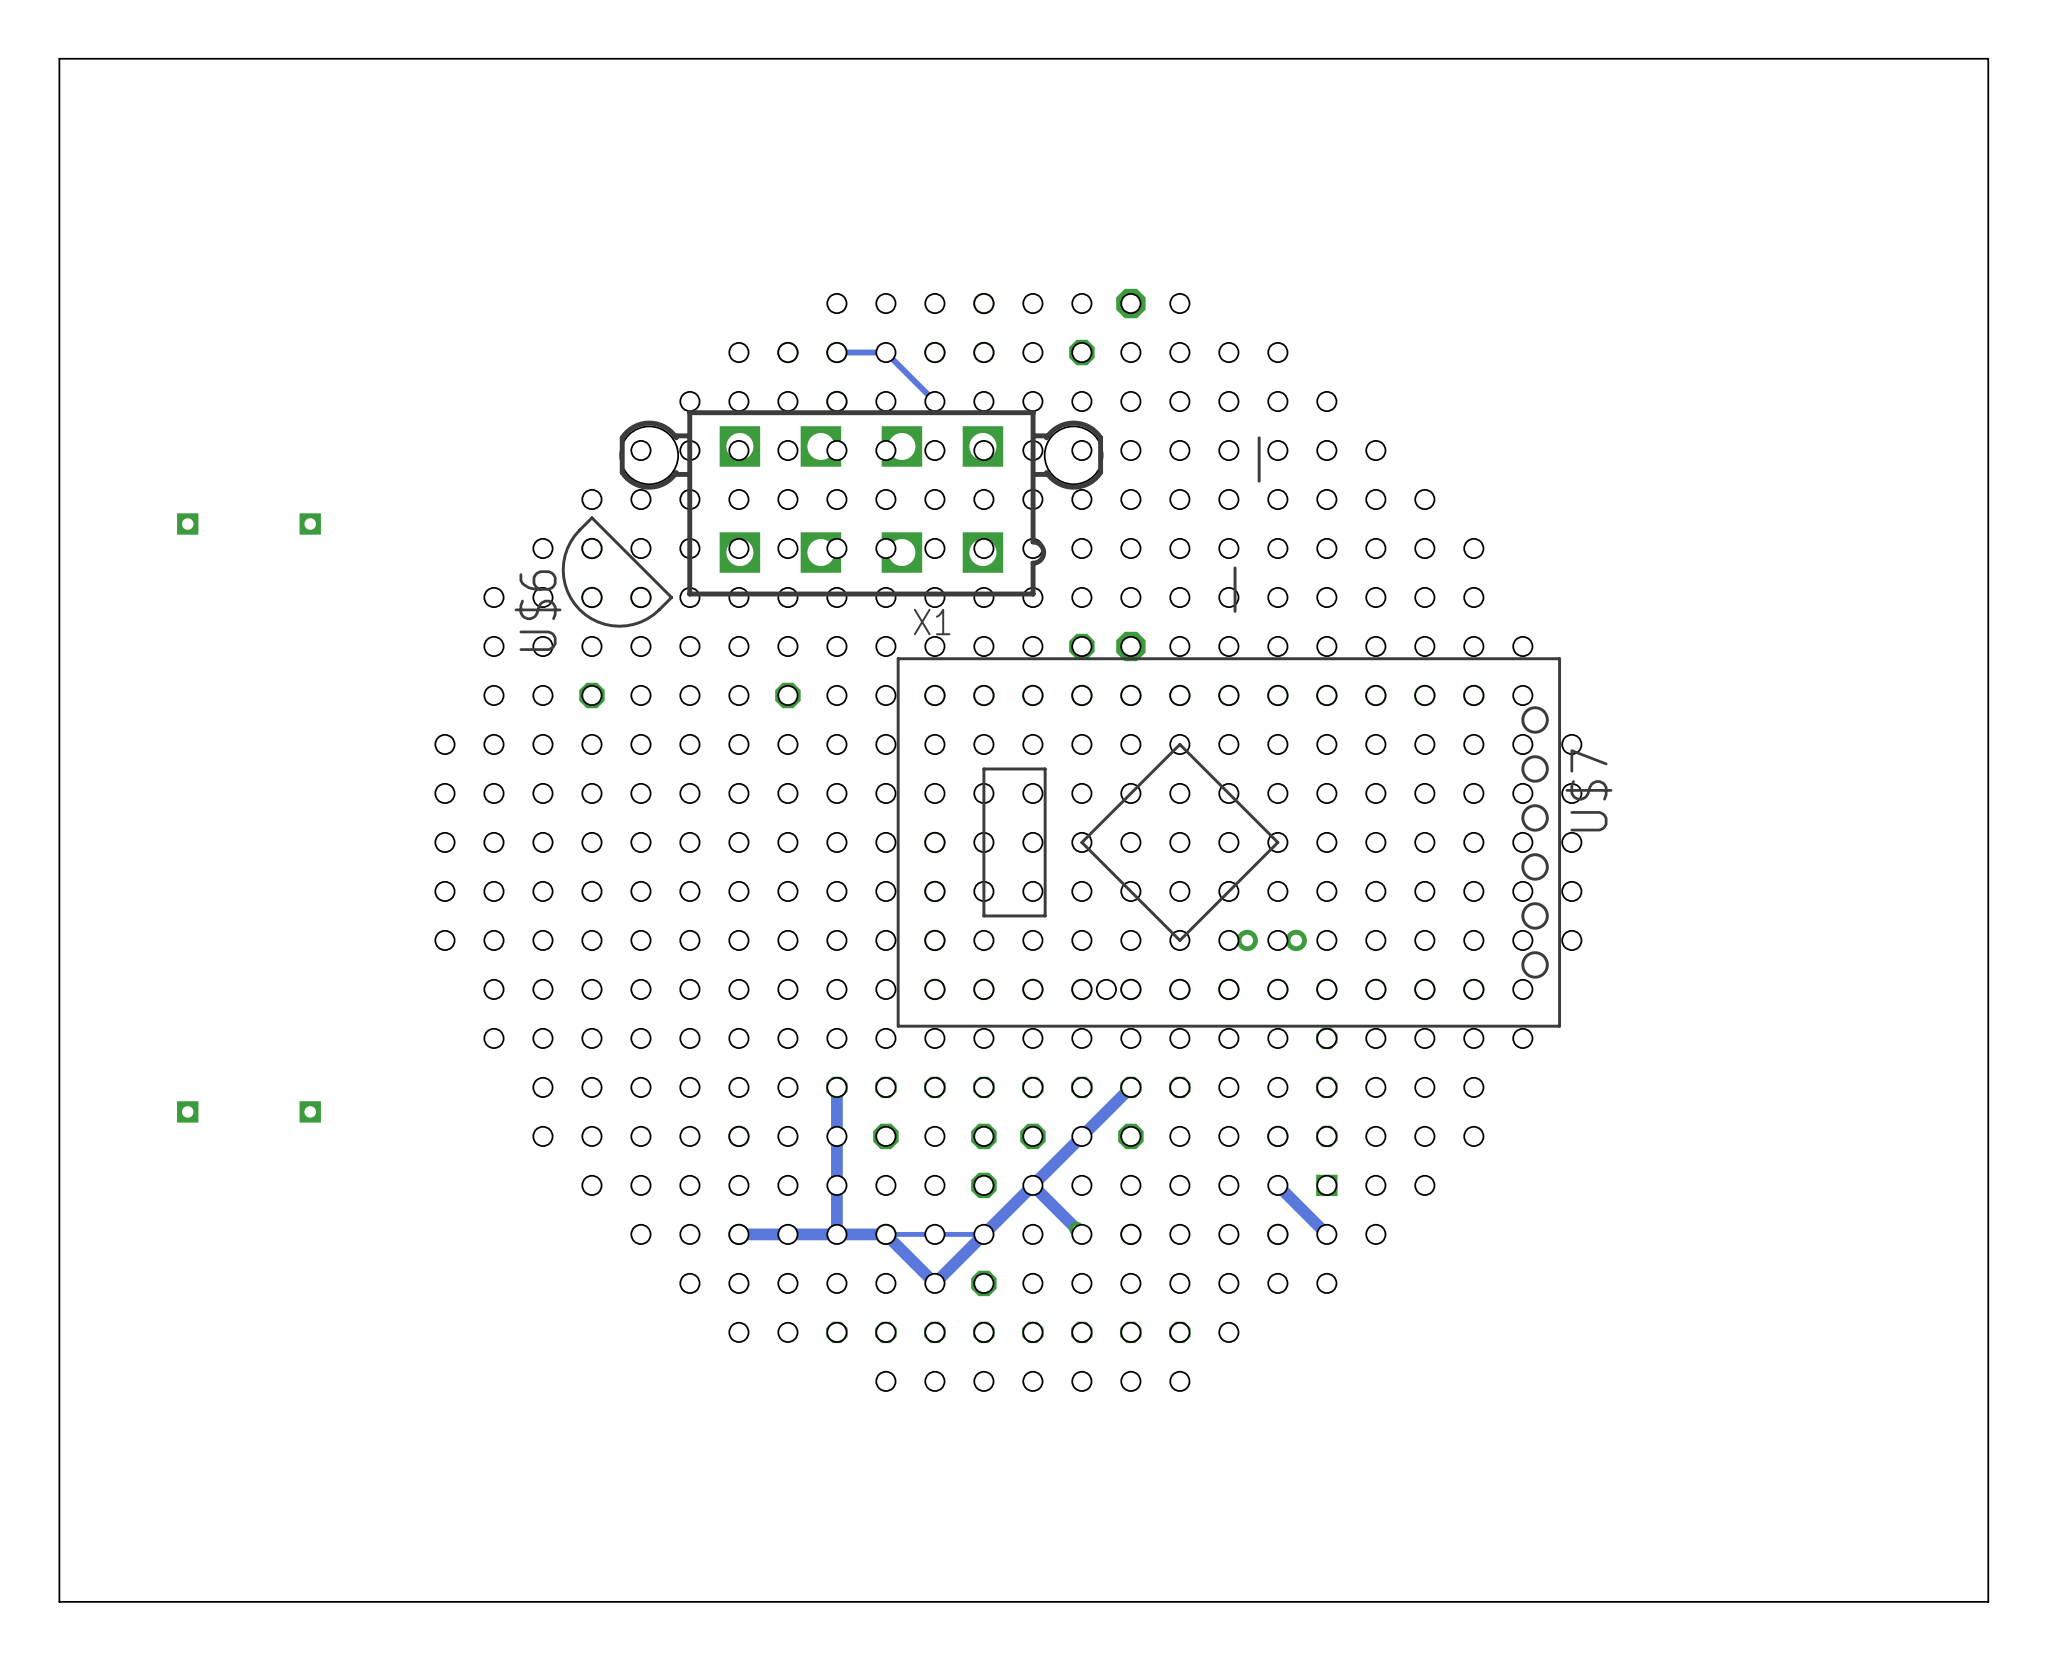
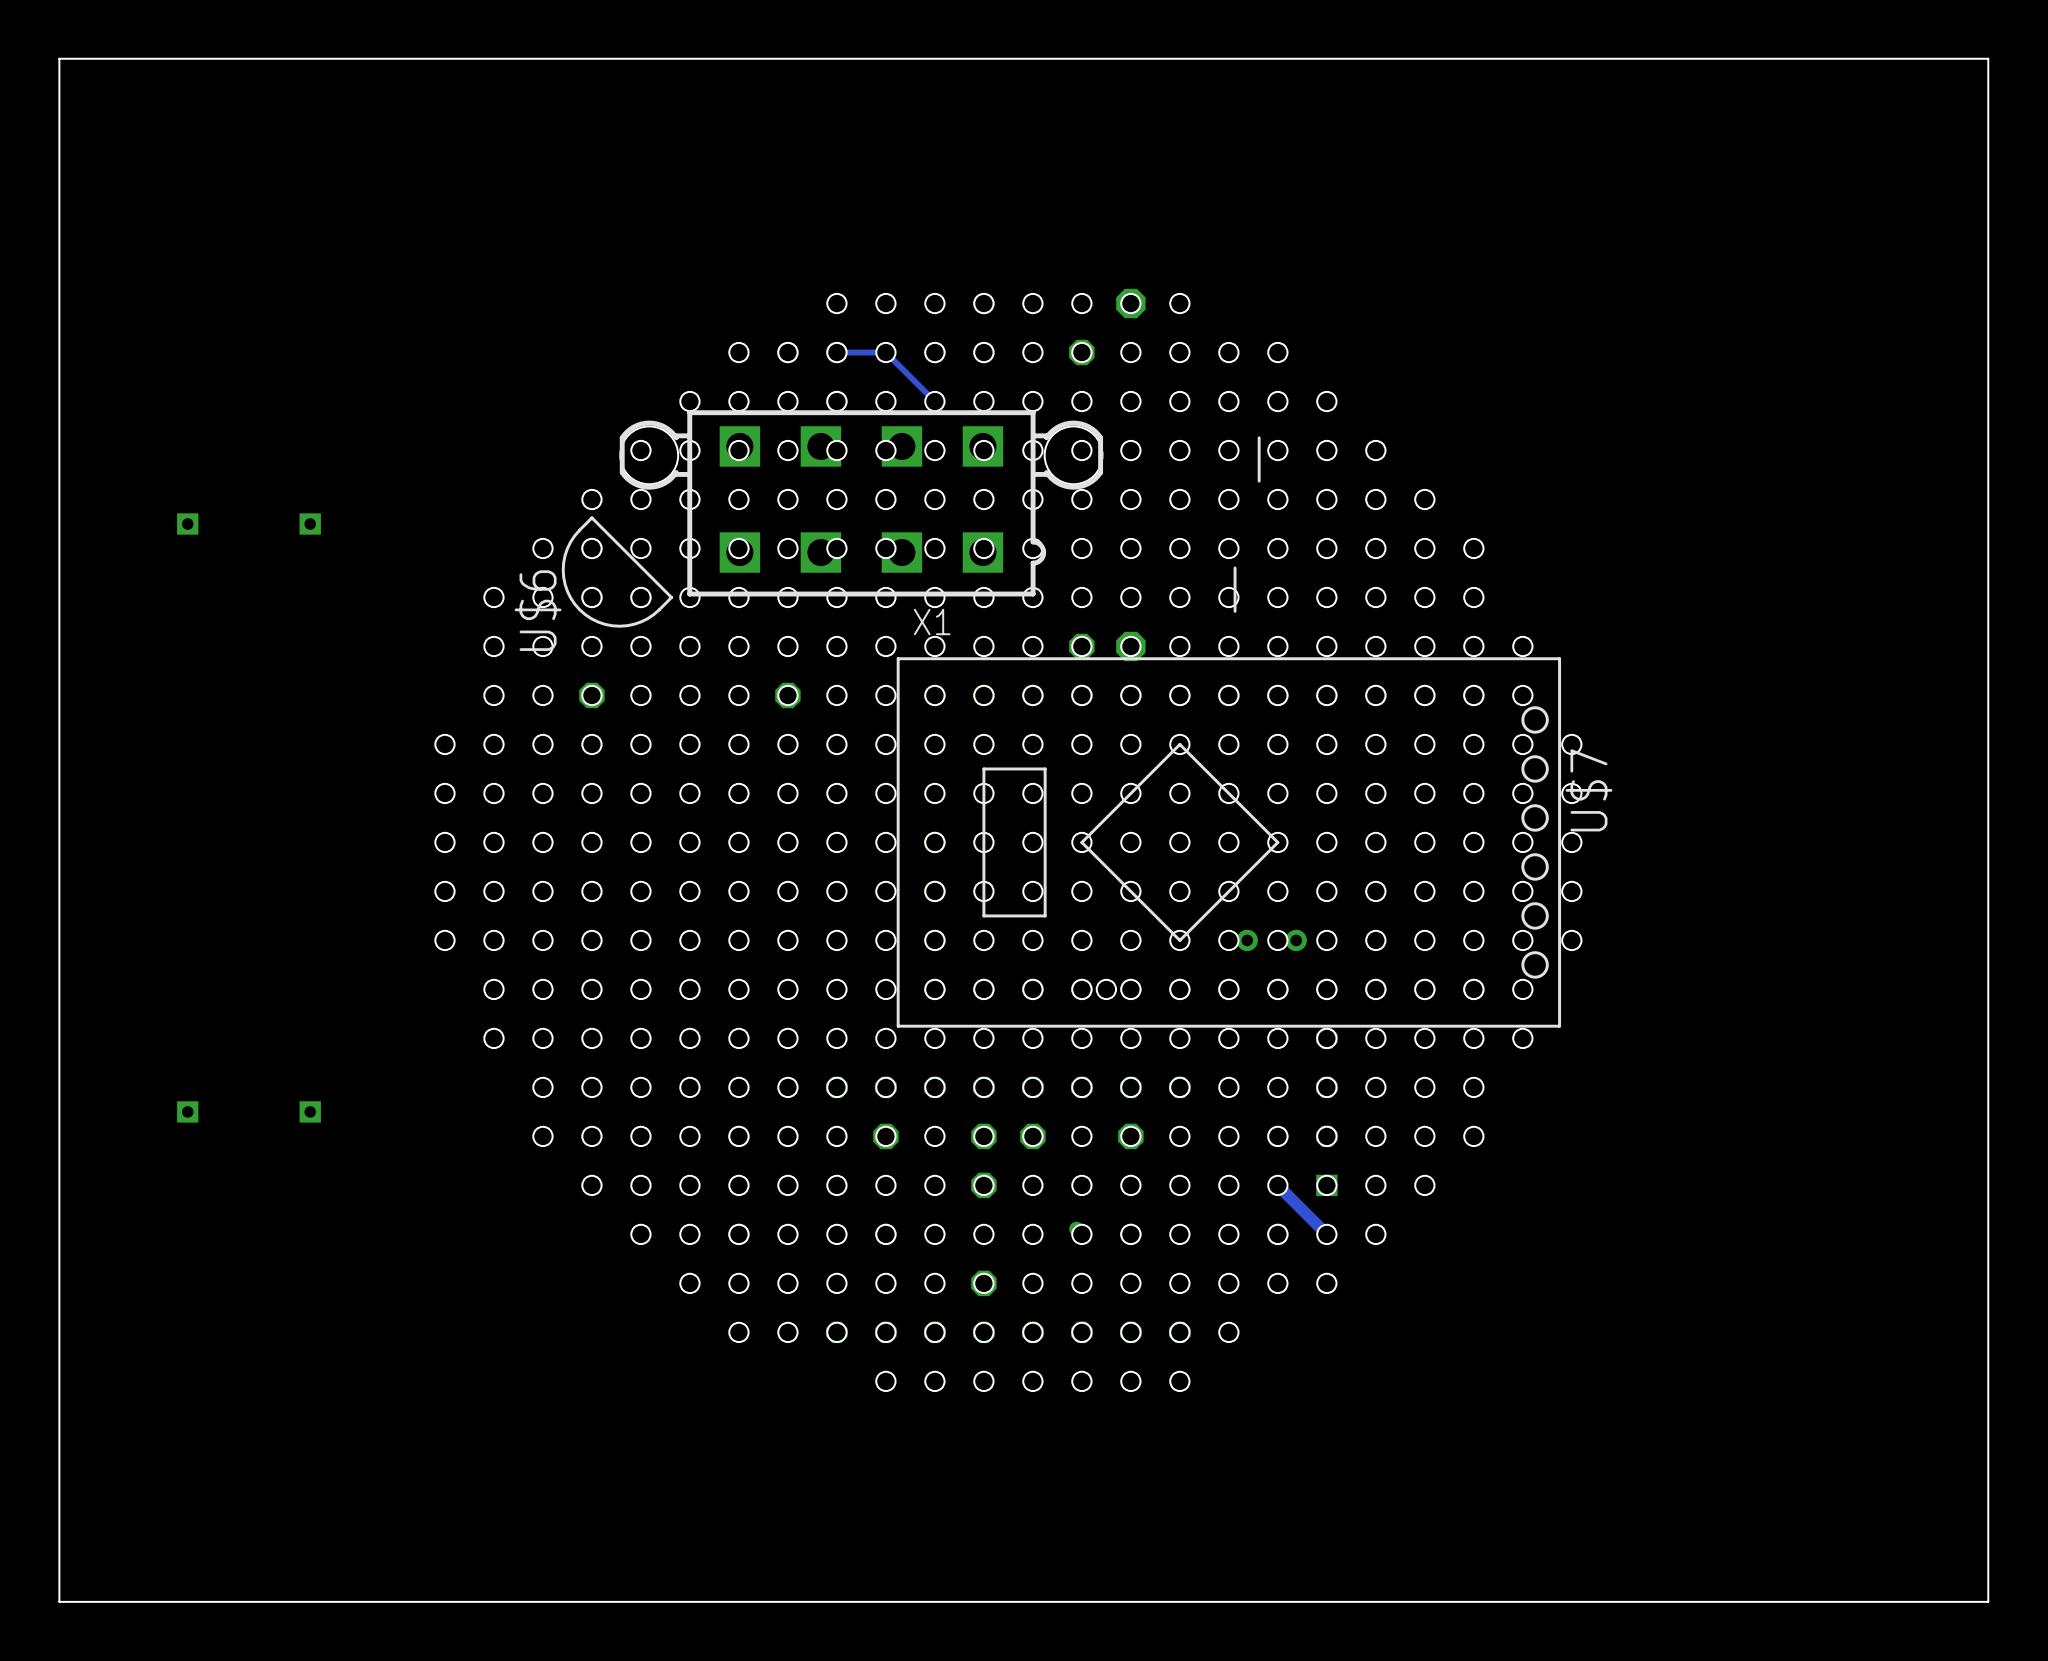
track: (836, 1087) (836, 1234) -> none
track: (1130, 1087) (934, 1283) (885, 1234) (738, 1234) -> none
track: (1032, 1185) (1076, 1229) -> none
track: (983, 1234) (880, 1234) -> none

